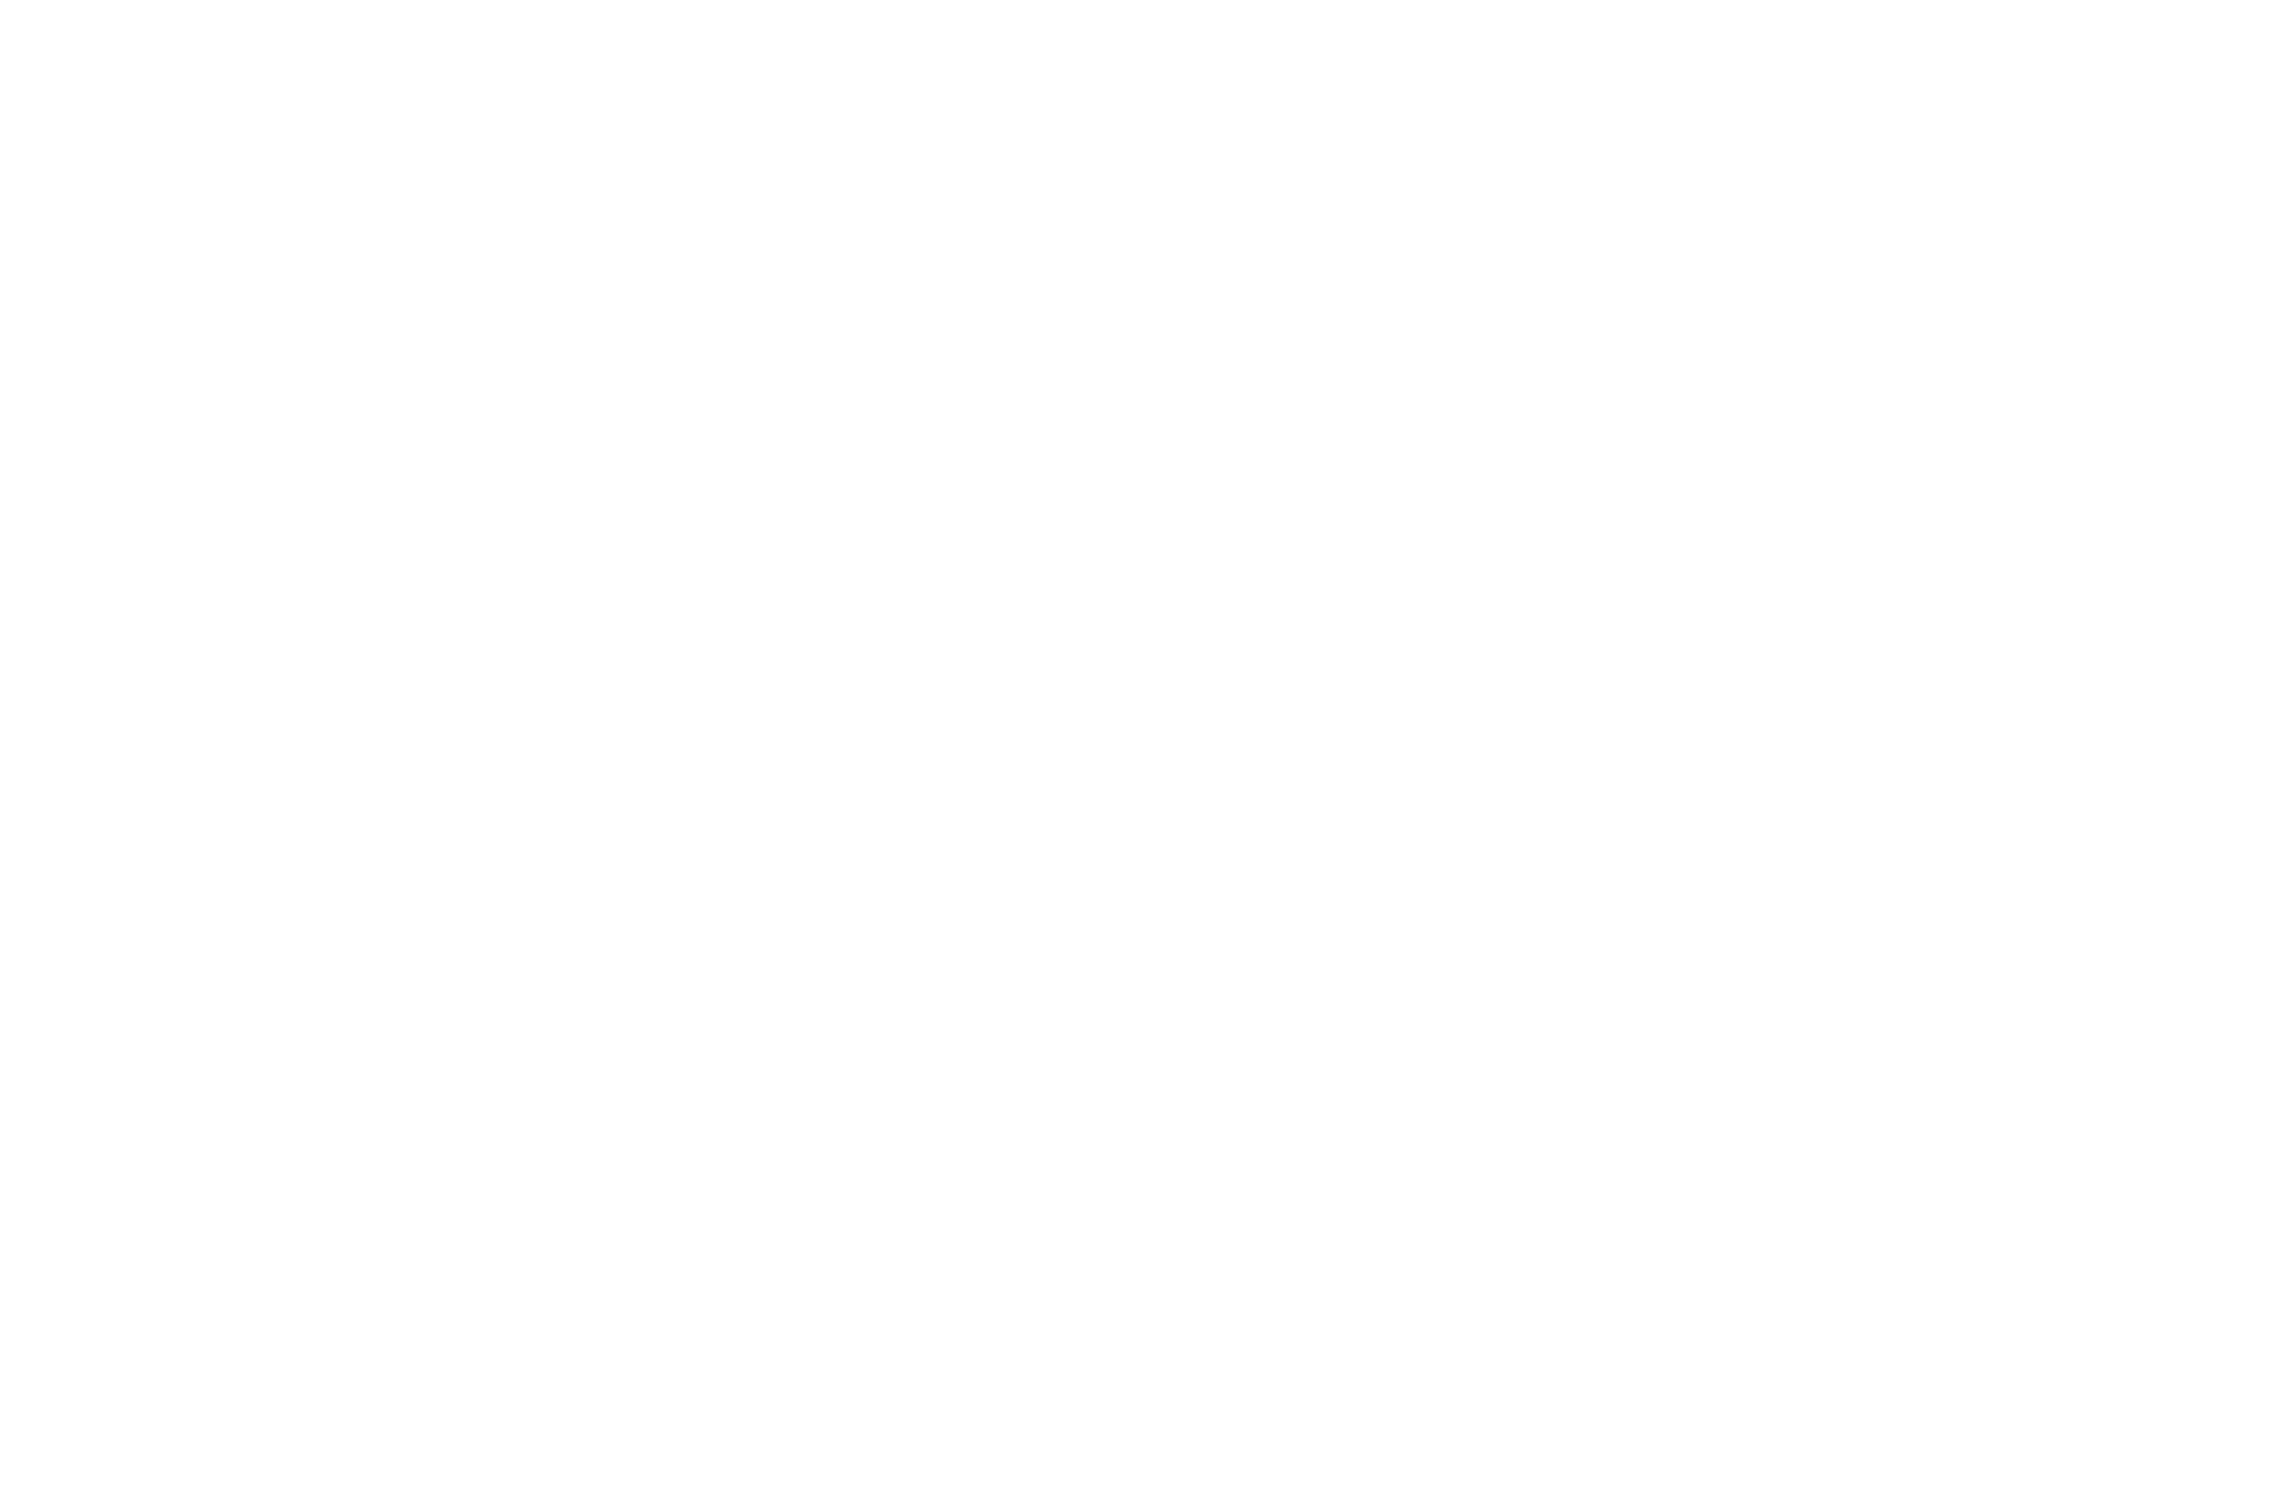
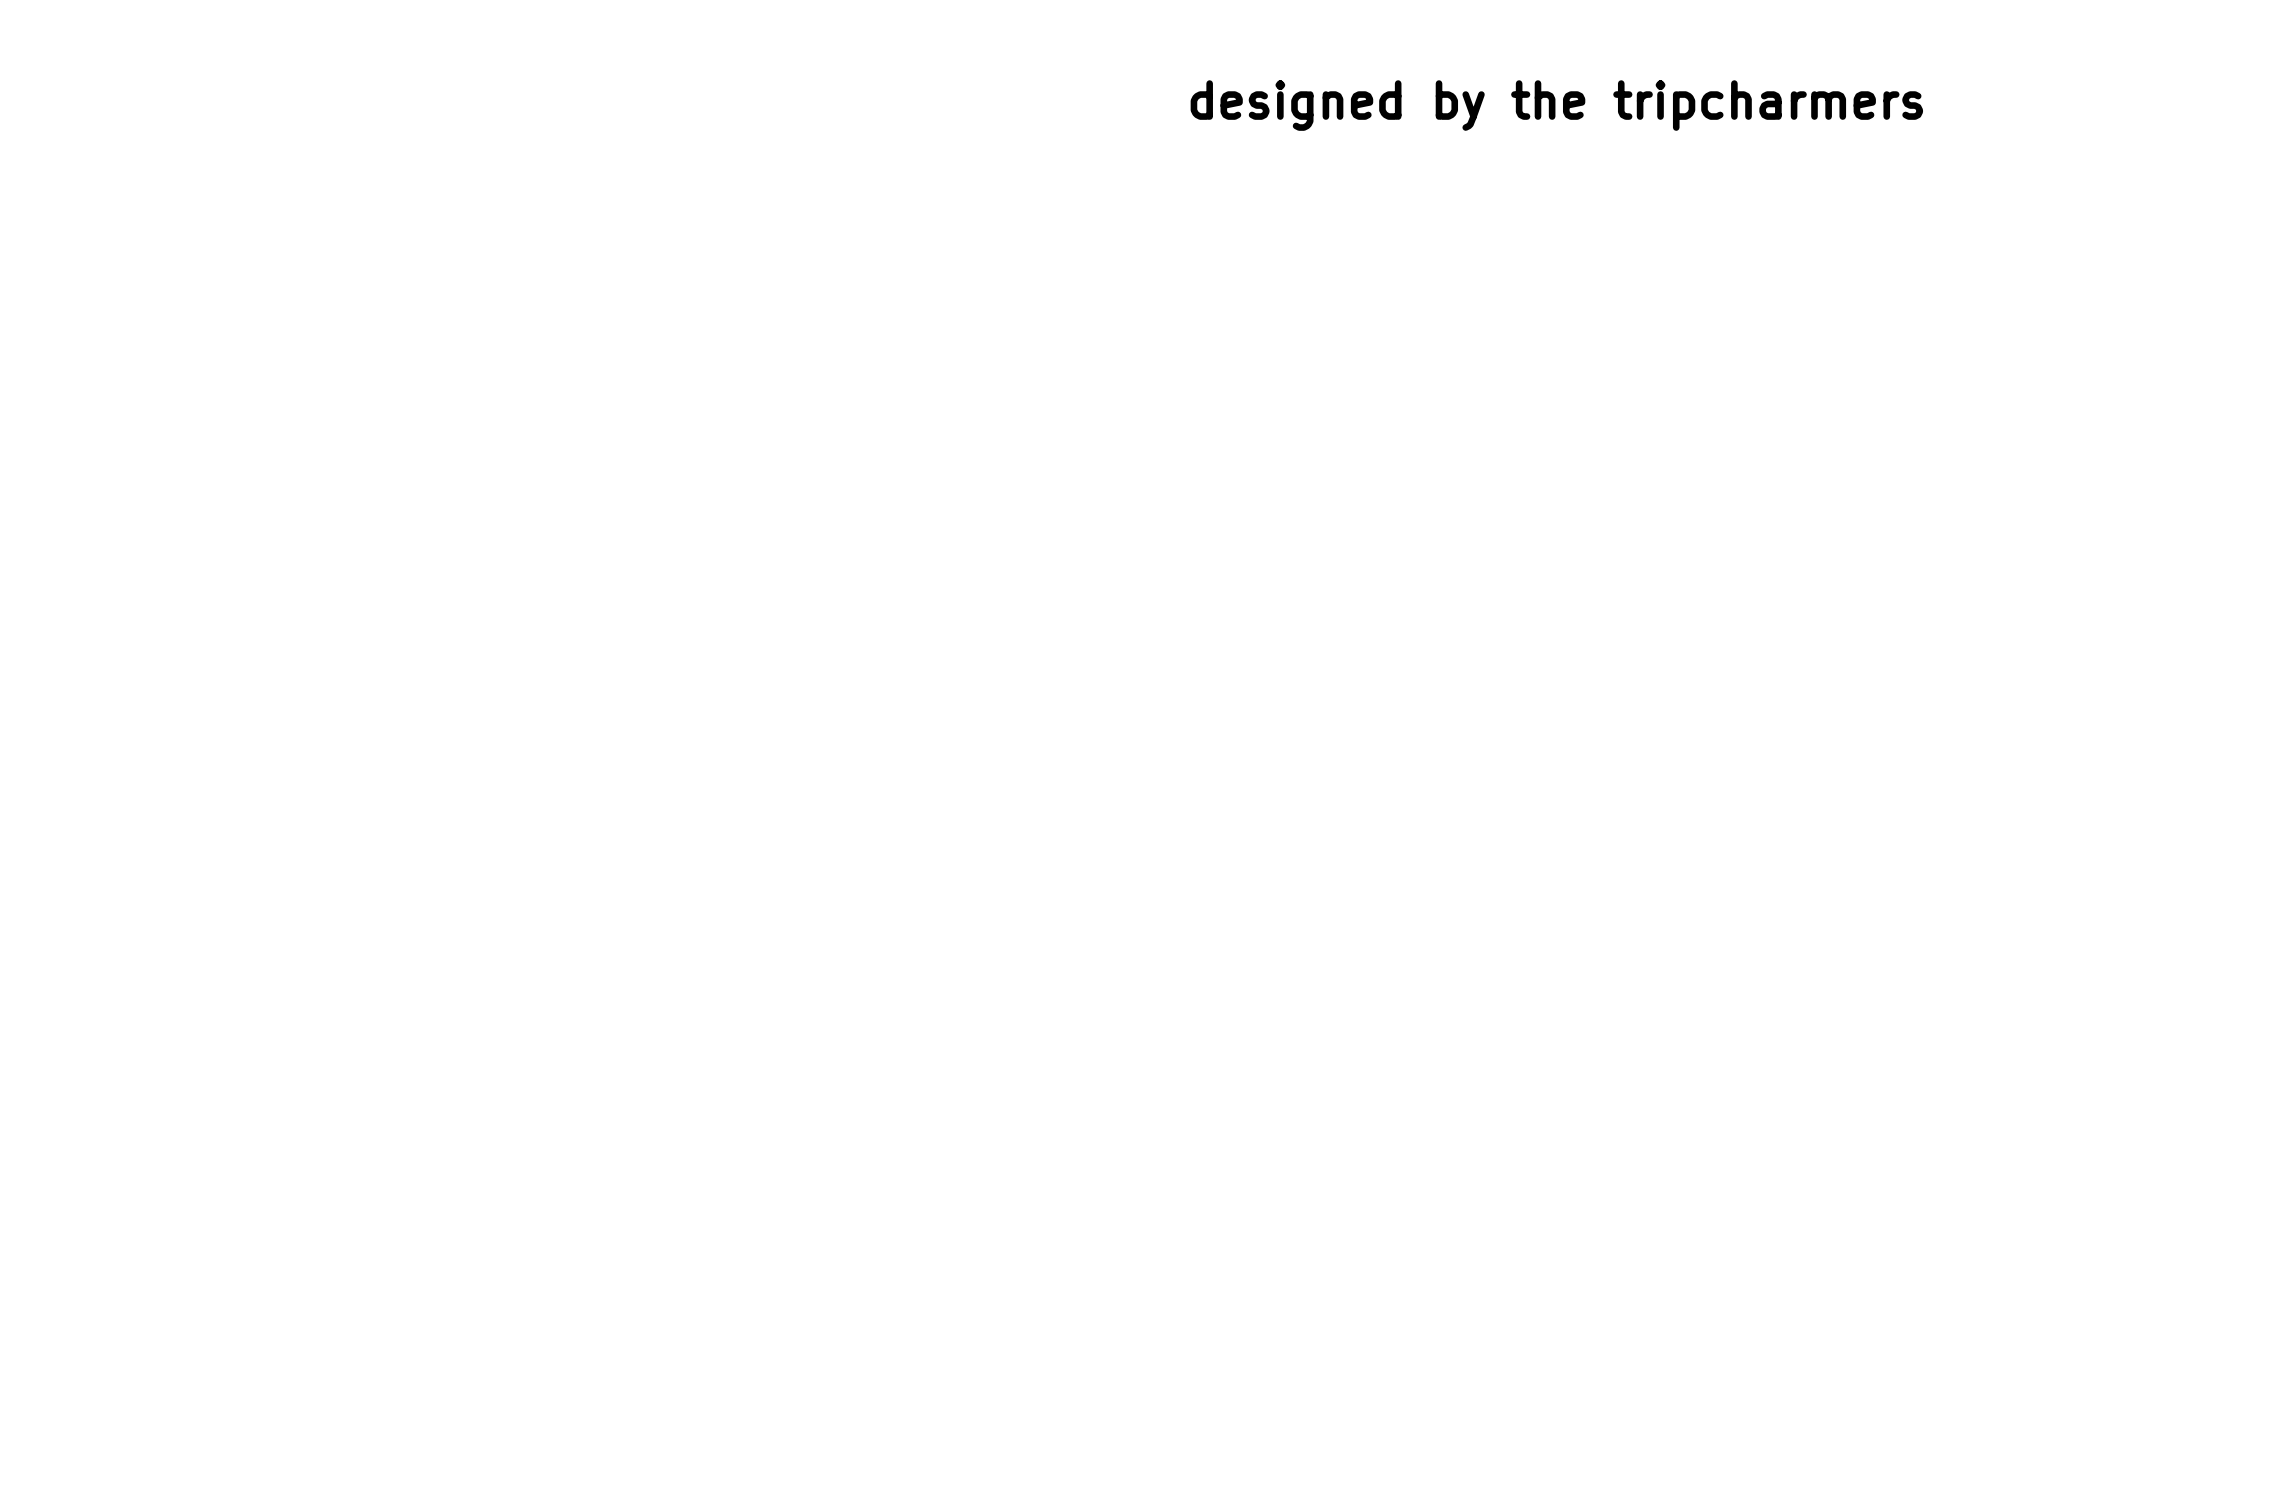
text: none -> designed by the tripcharmers (1556, 105)

